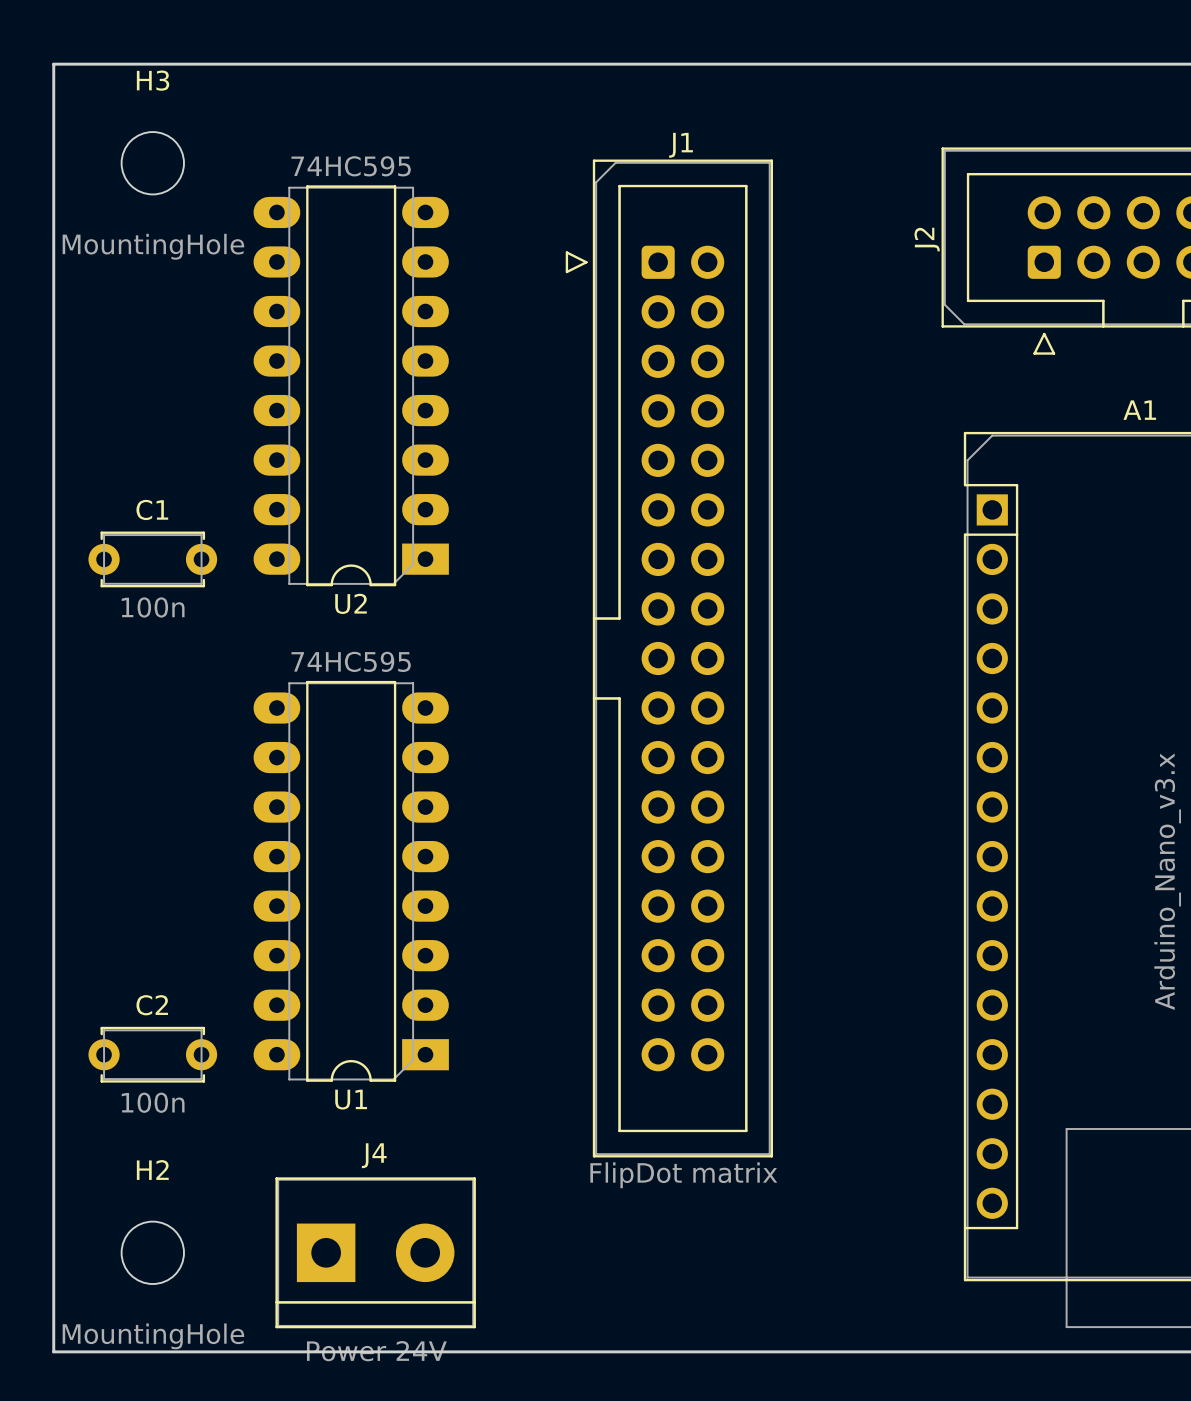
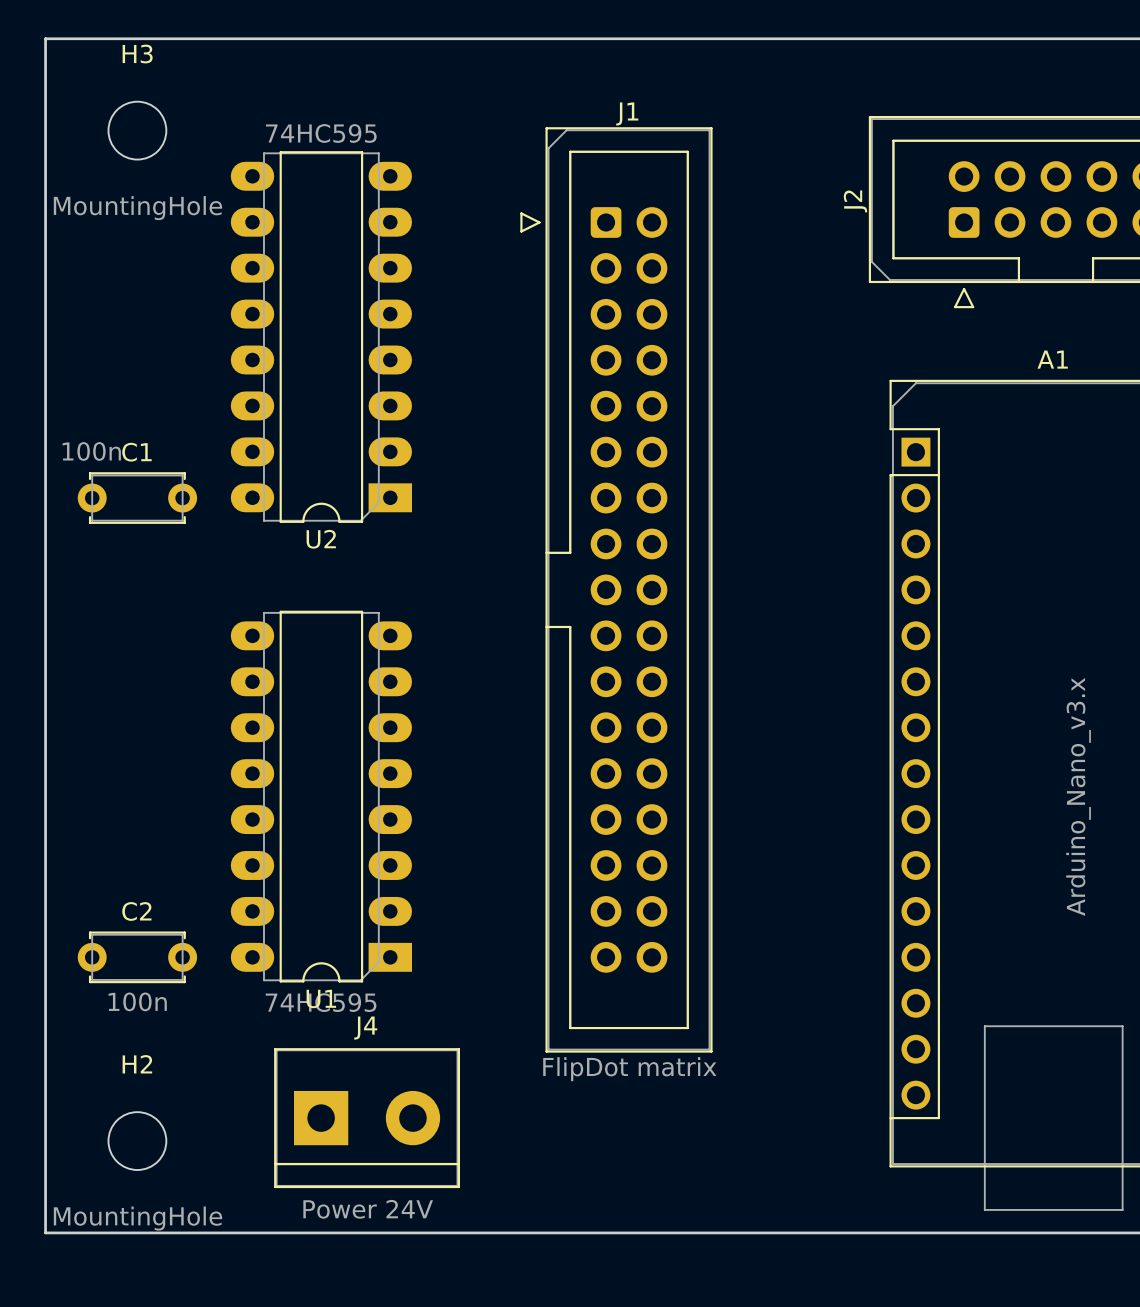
C1 value position: 100n (153, 607) -> 100n (91, 451)
U1 value position: 74HC595 (351, 661) -> 74HC595 (321, 1002)
J4 position: (375, 1252) -> (367, 1118)

